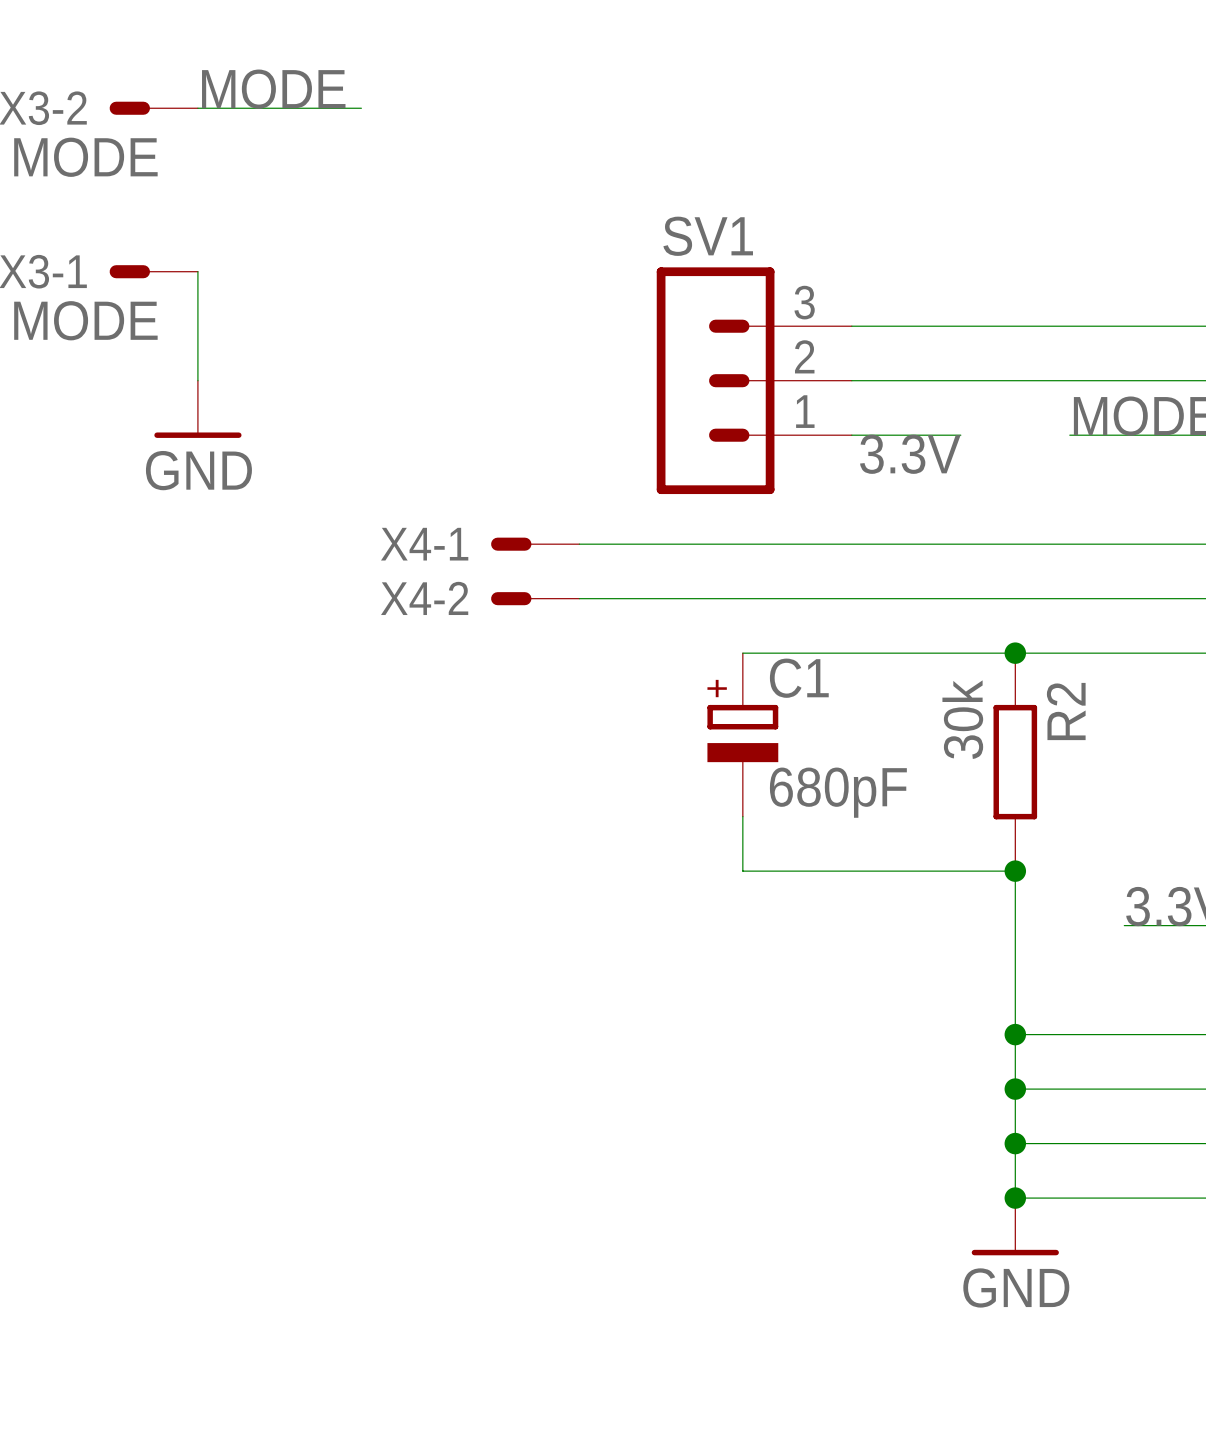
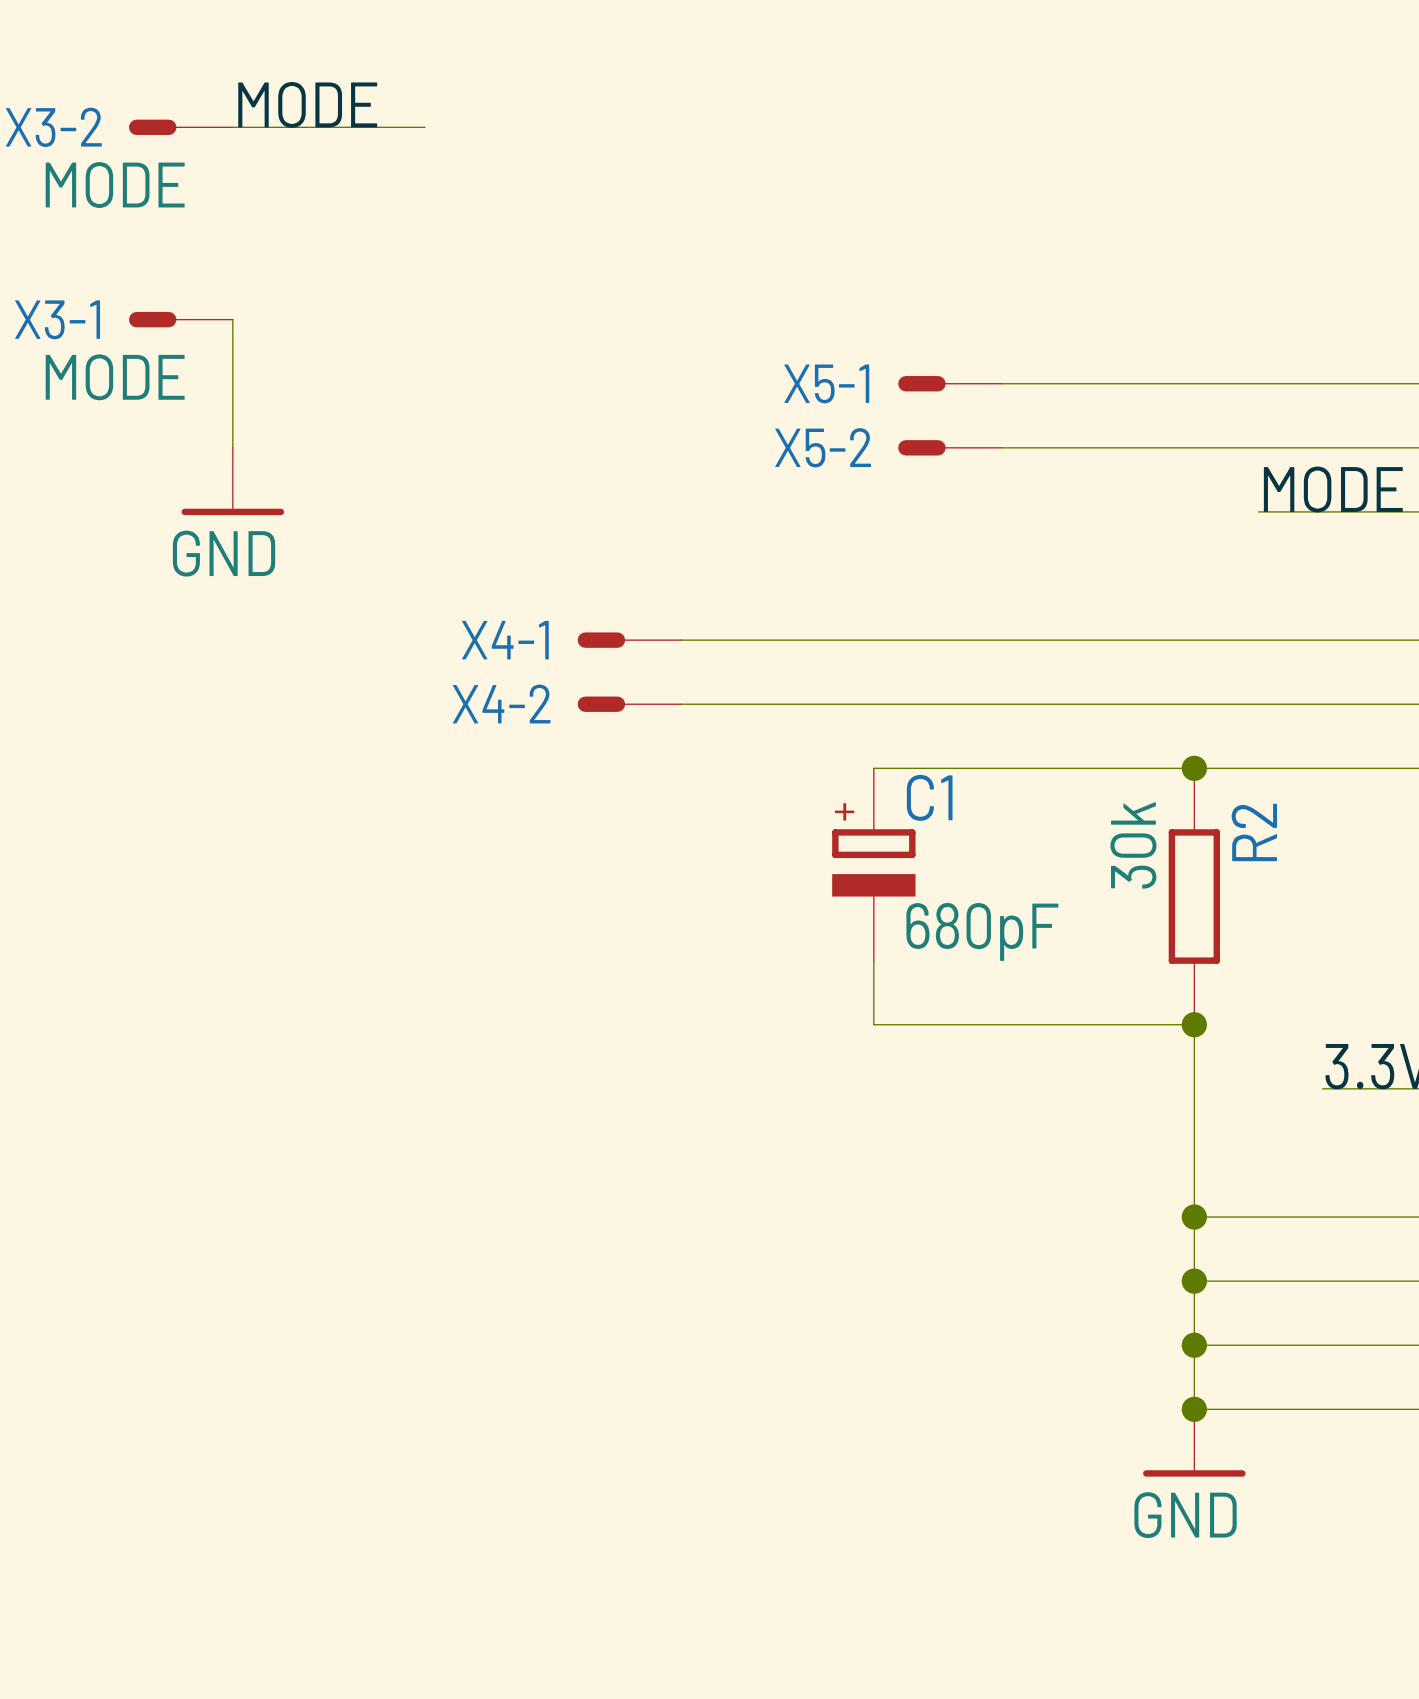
X5-1: none -> (950, 383)
SV1: (754, 380) -> none
X5-2: none -> (950, 447)
wire: (851, 435) (960, 435) -> none
label: 3.3V (910, 454) -> none

